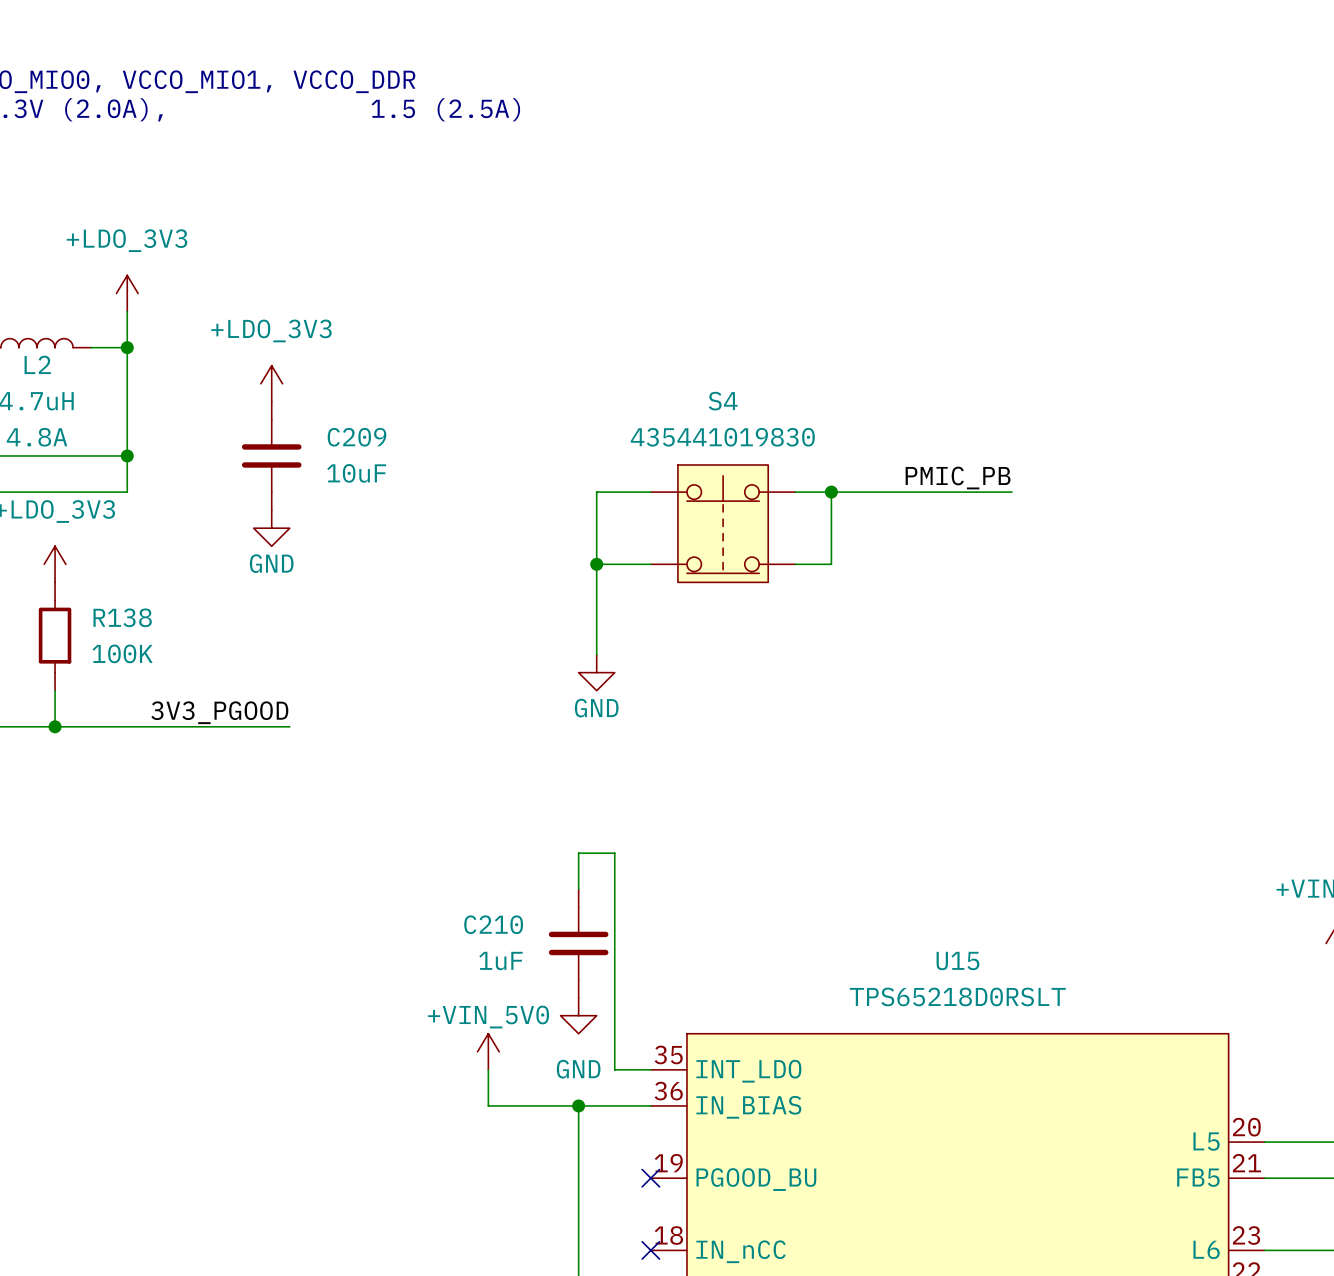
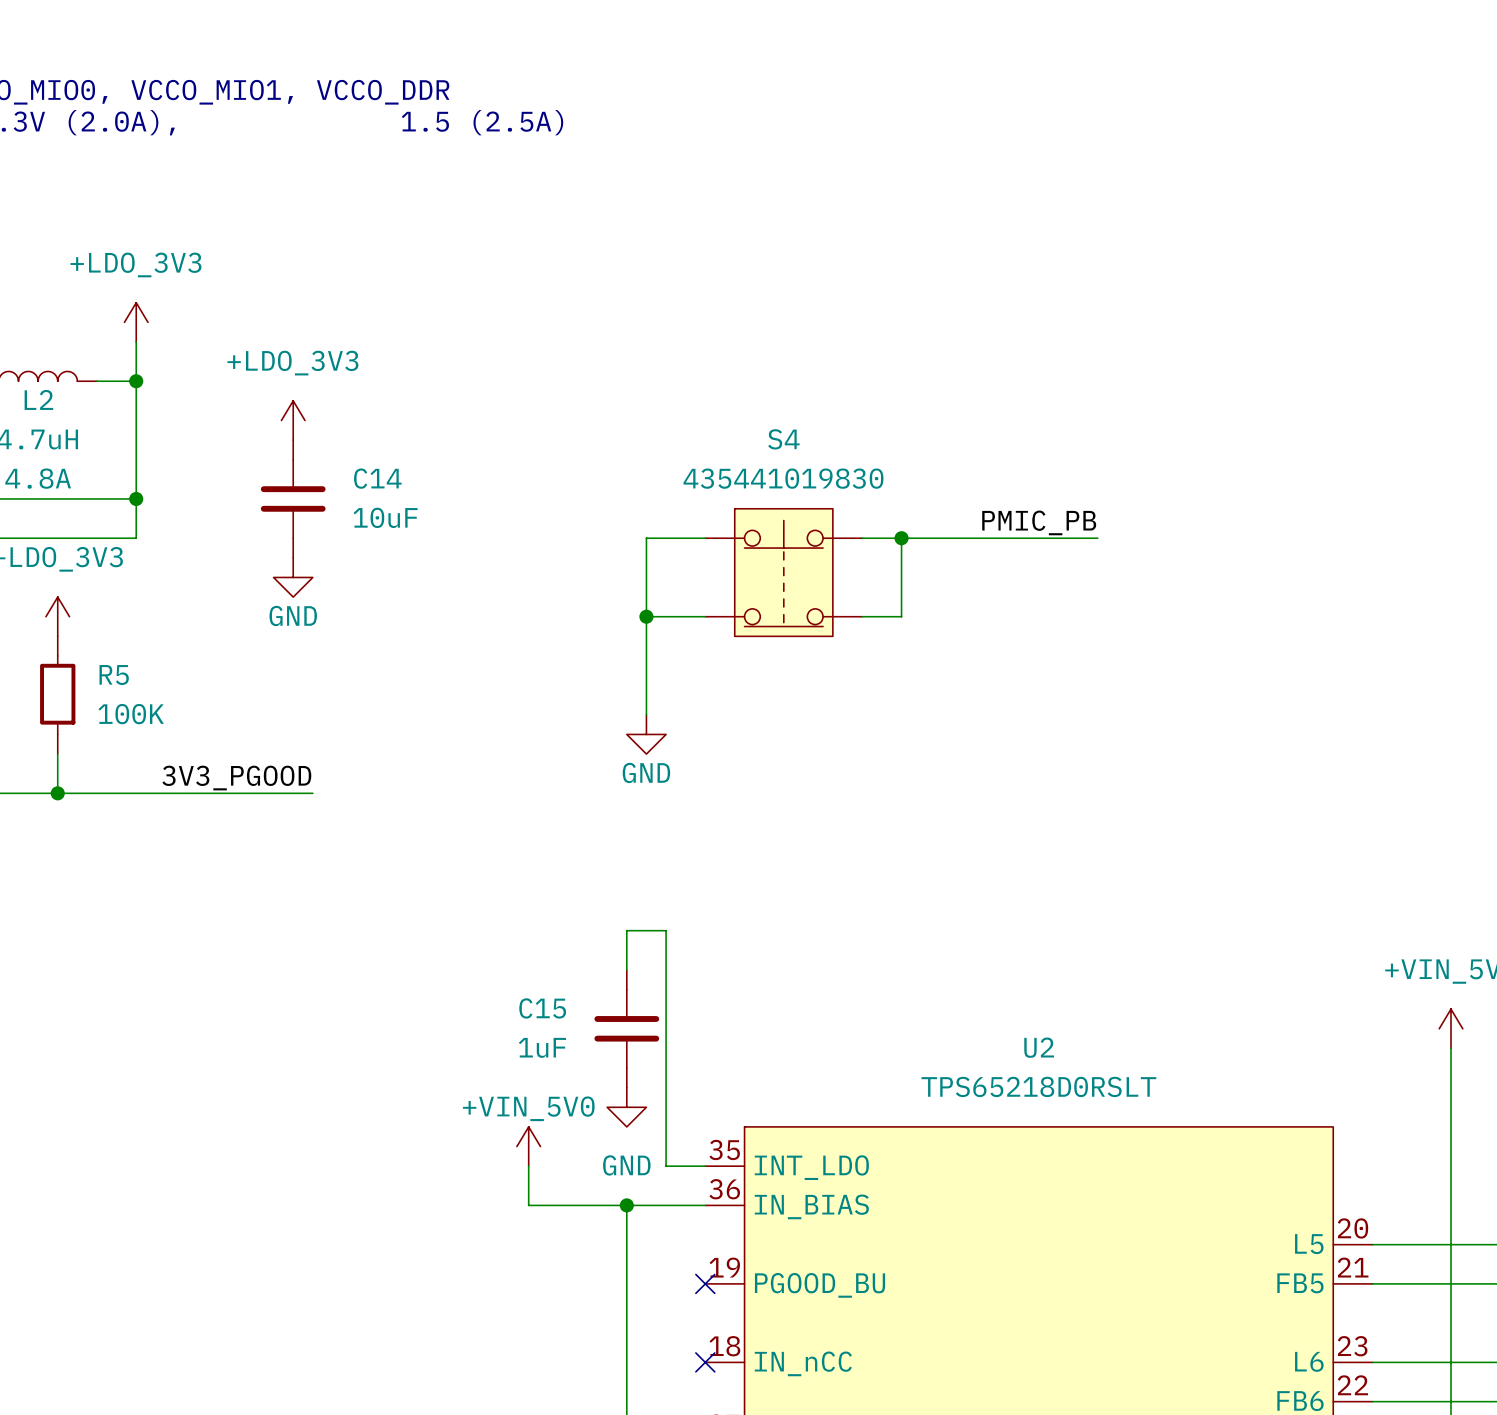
C209 name: C209 (356, 437) -> C14 (377, 478)
R138 name: R138 (122, 617) -> R5 (114, 675)
C210 name: C210 (493, 924) -> C15 (542, 1008)
U15 name: U15 (957, 961) -> U2 (1039, 1047)

